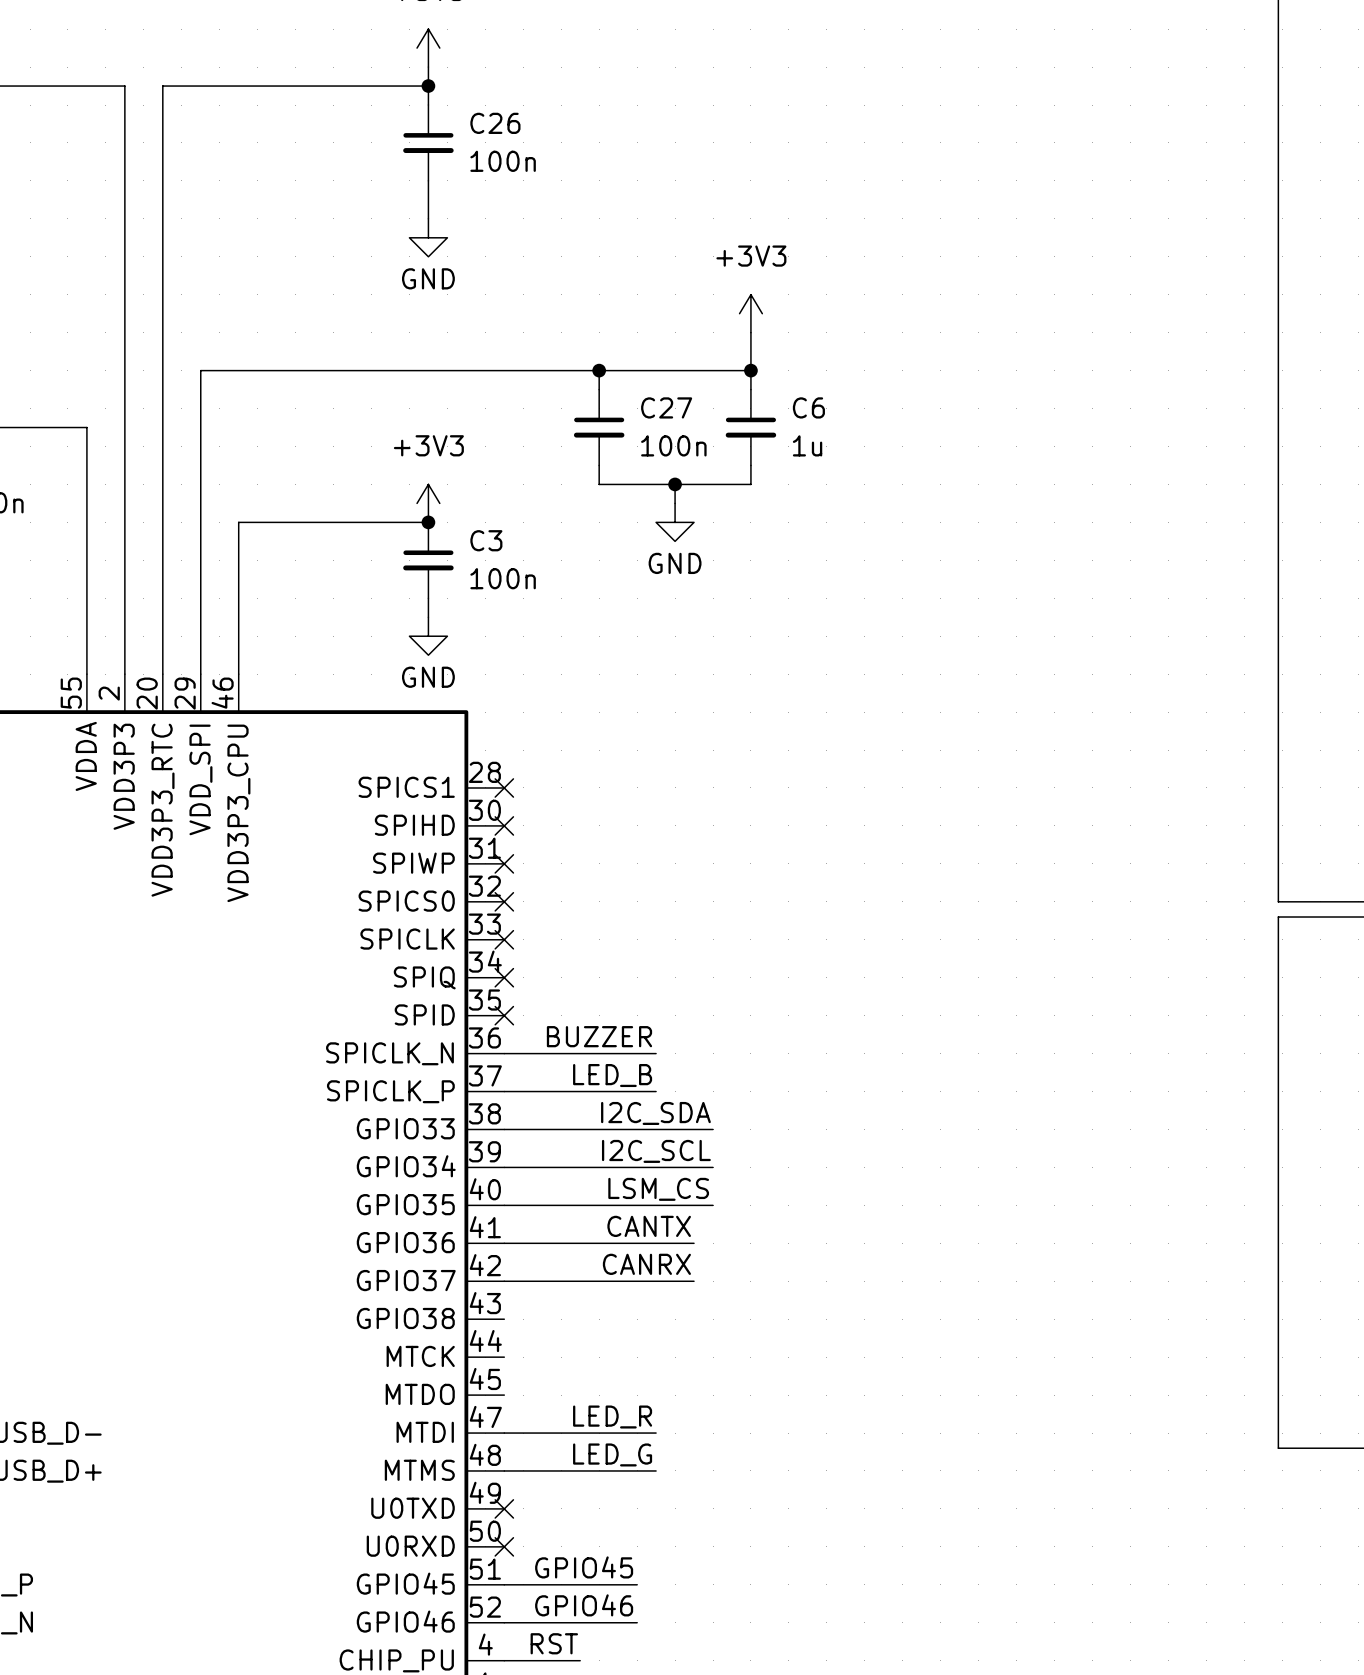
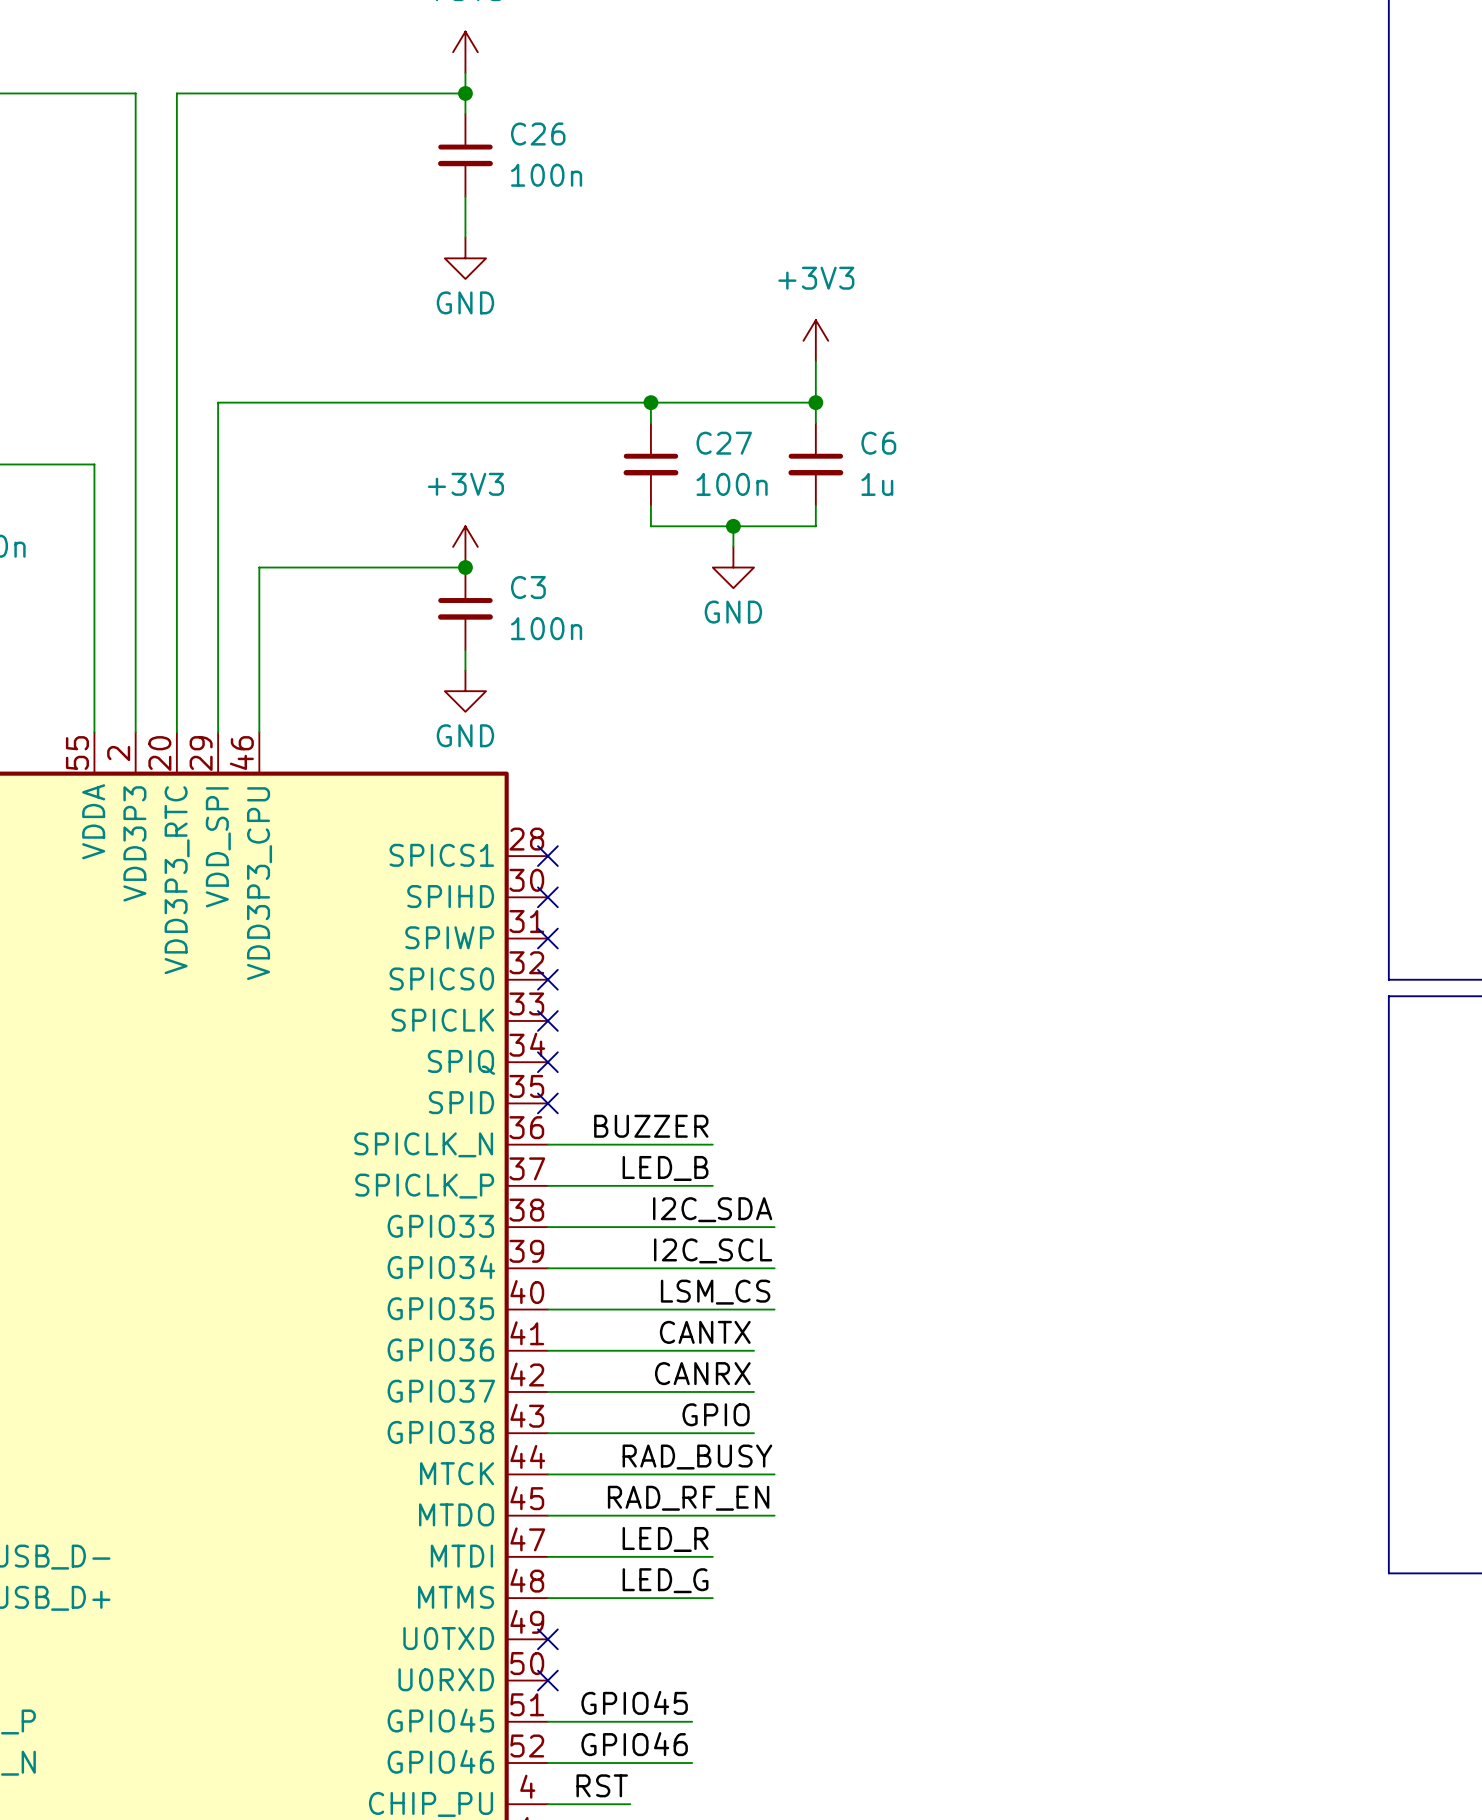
label: none -> GPIO (716, 1414)
wire: none -> (547, 1433) (754, 1433)
label: none -> RAD_BUSY (697, 1457)
wire: none -> (547, 1474) (774, 1474)
label: none -> RAD_RF_EN (688, 1498)
wire: none -> (547, 1515) (774, 1515)

